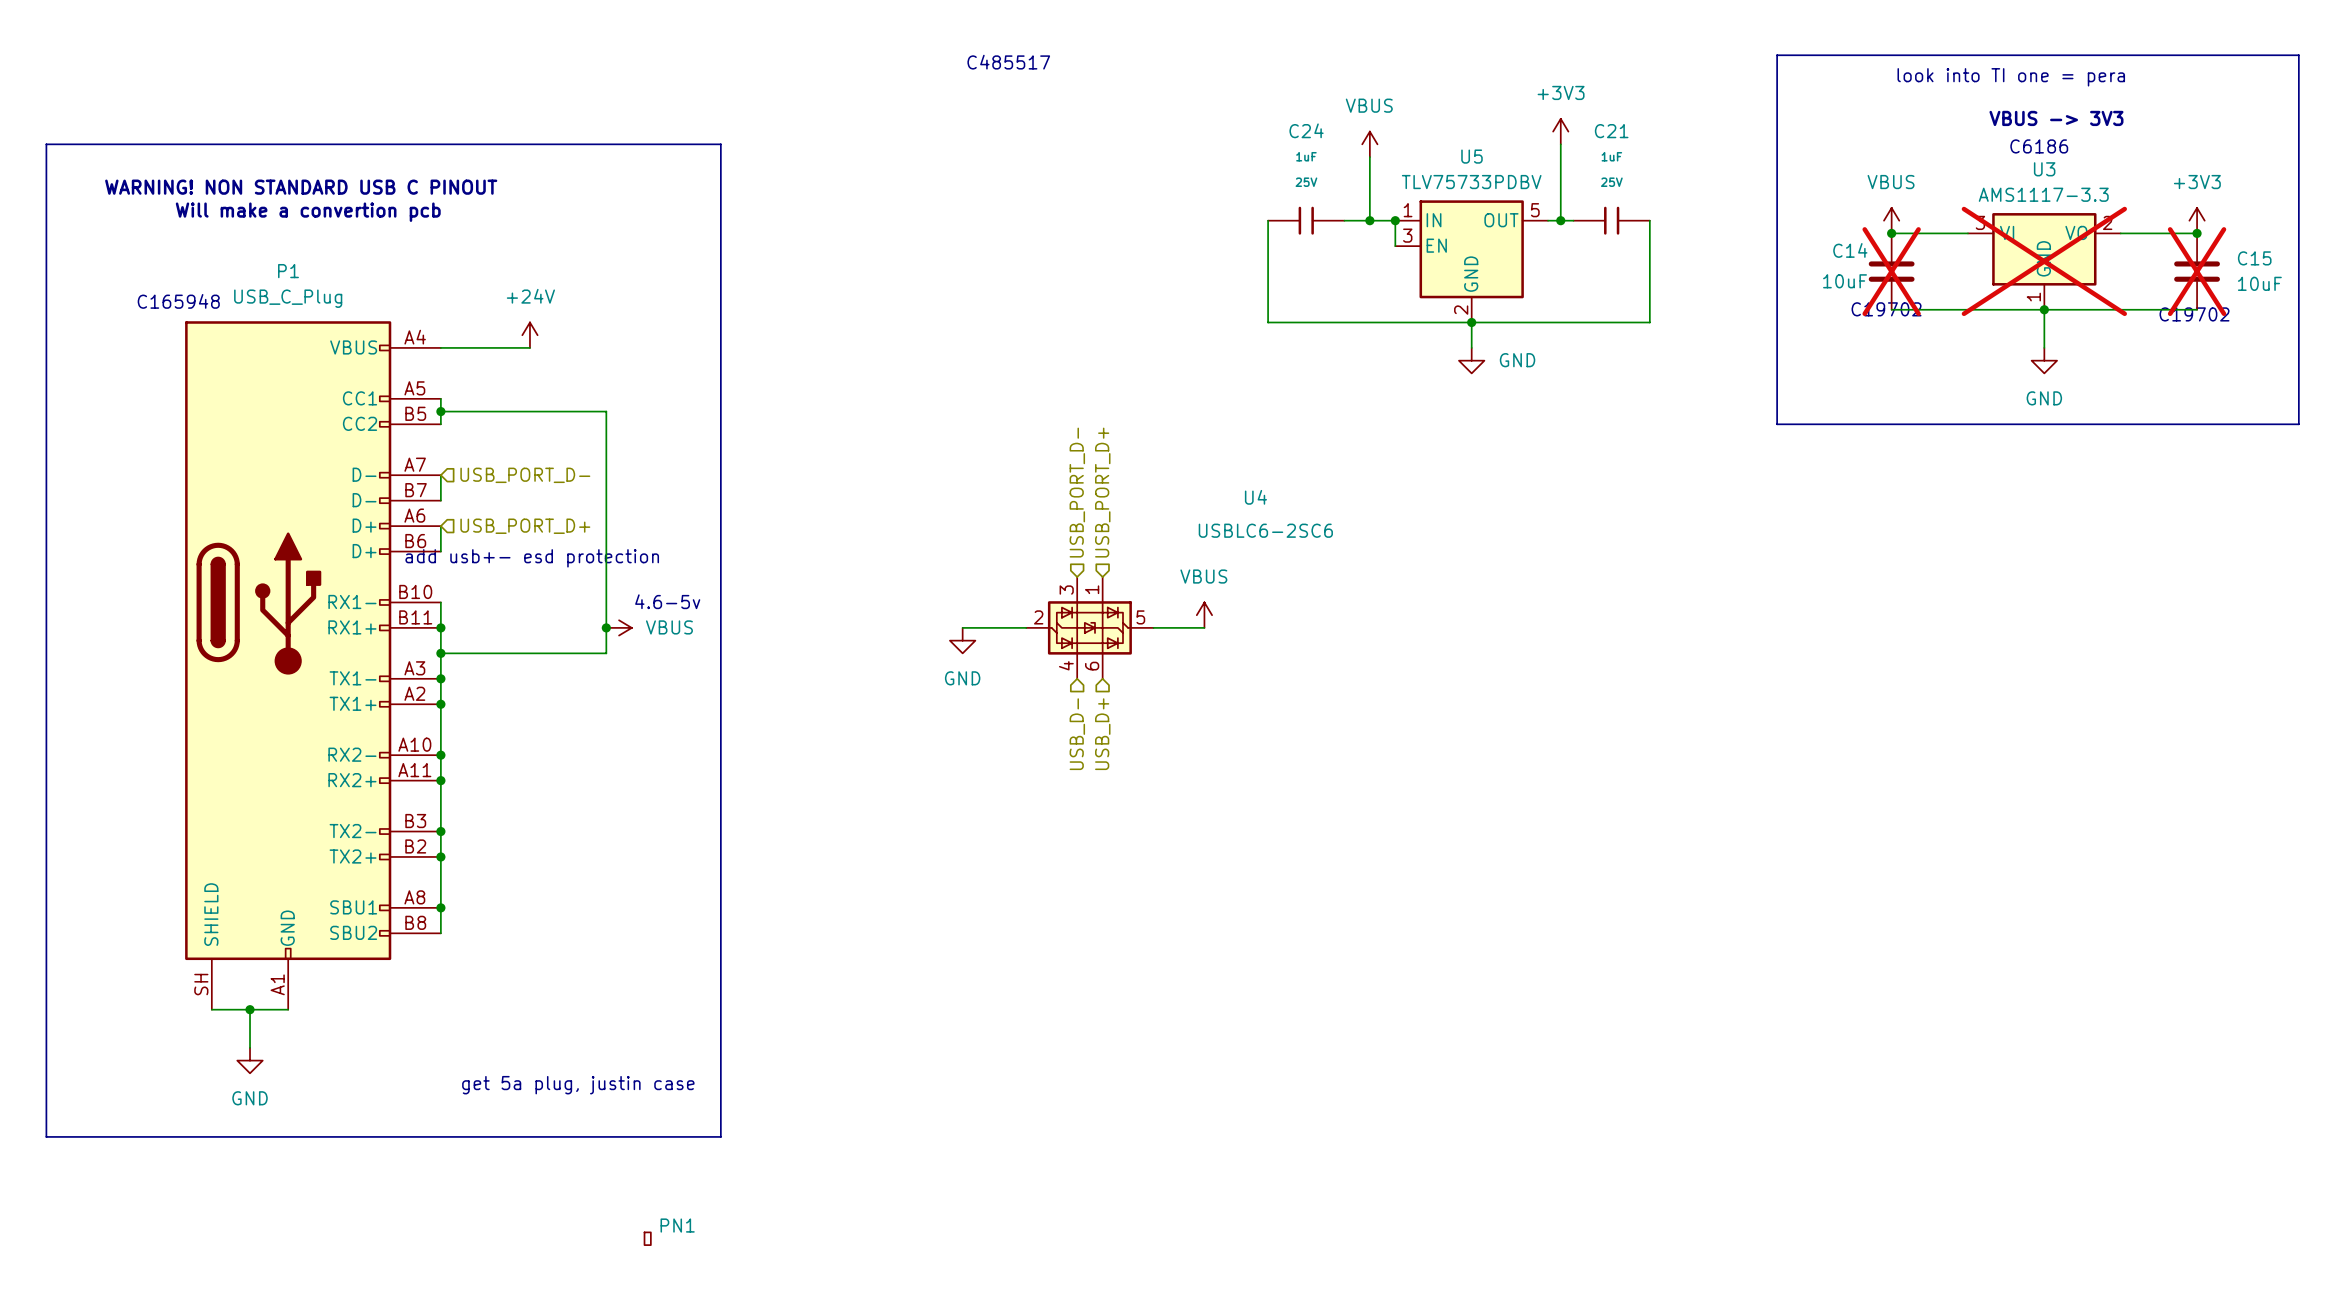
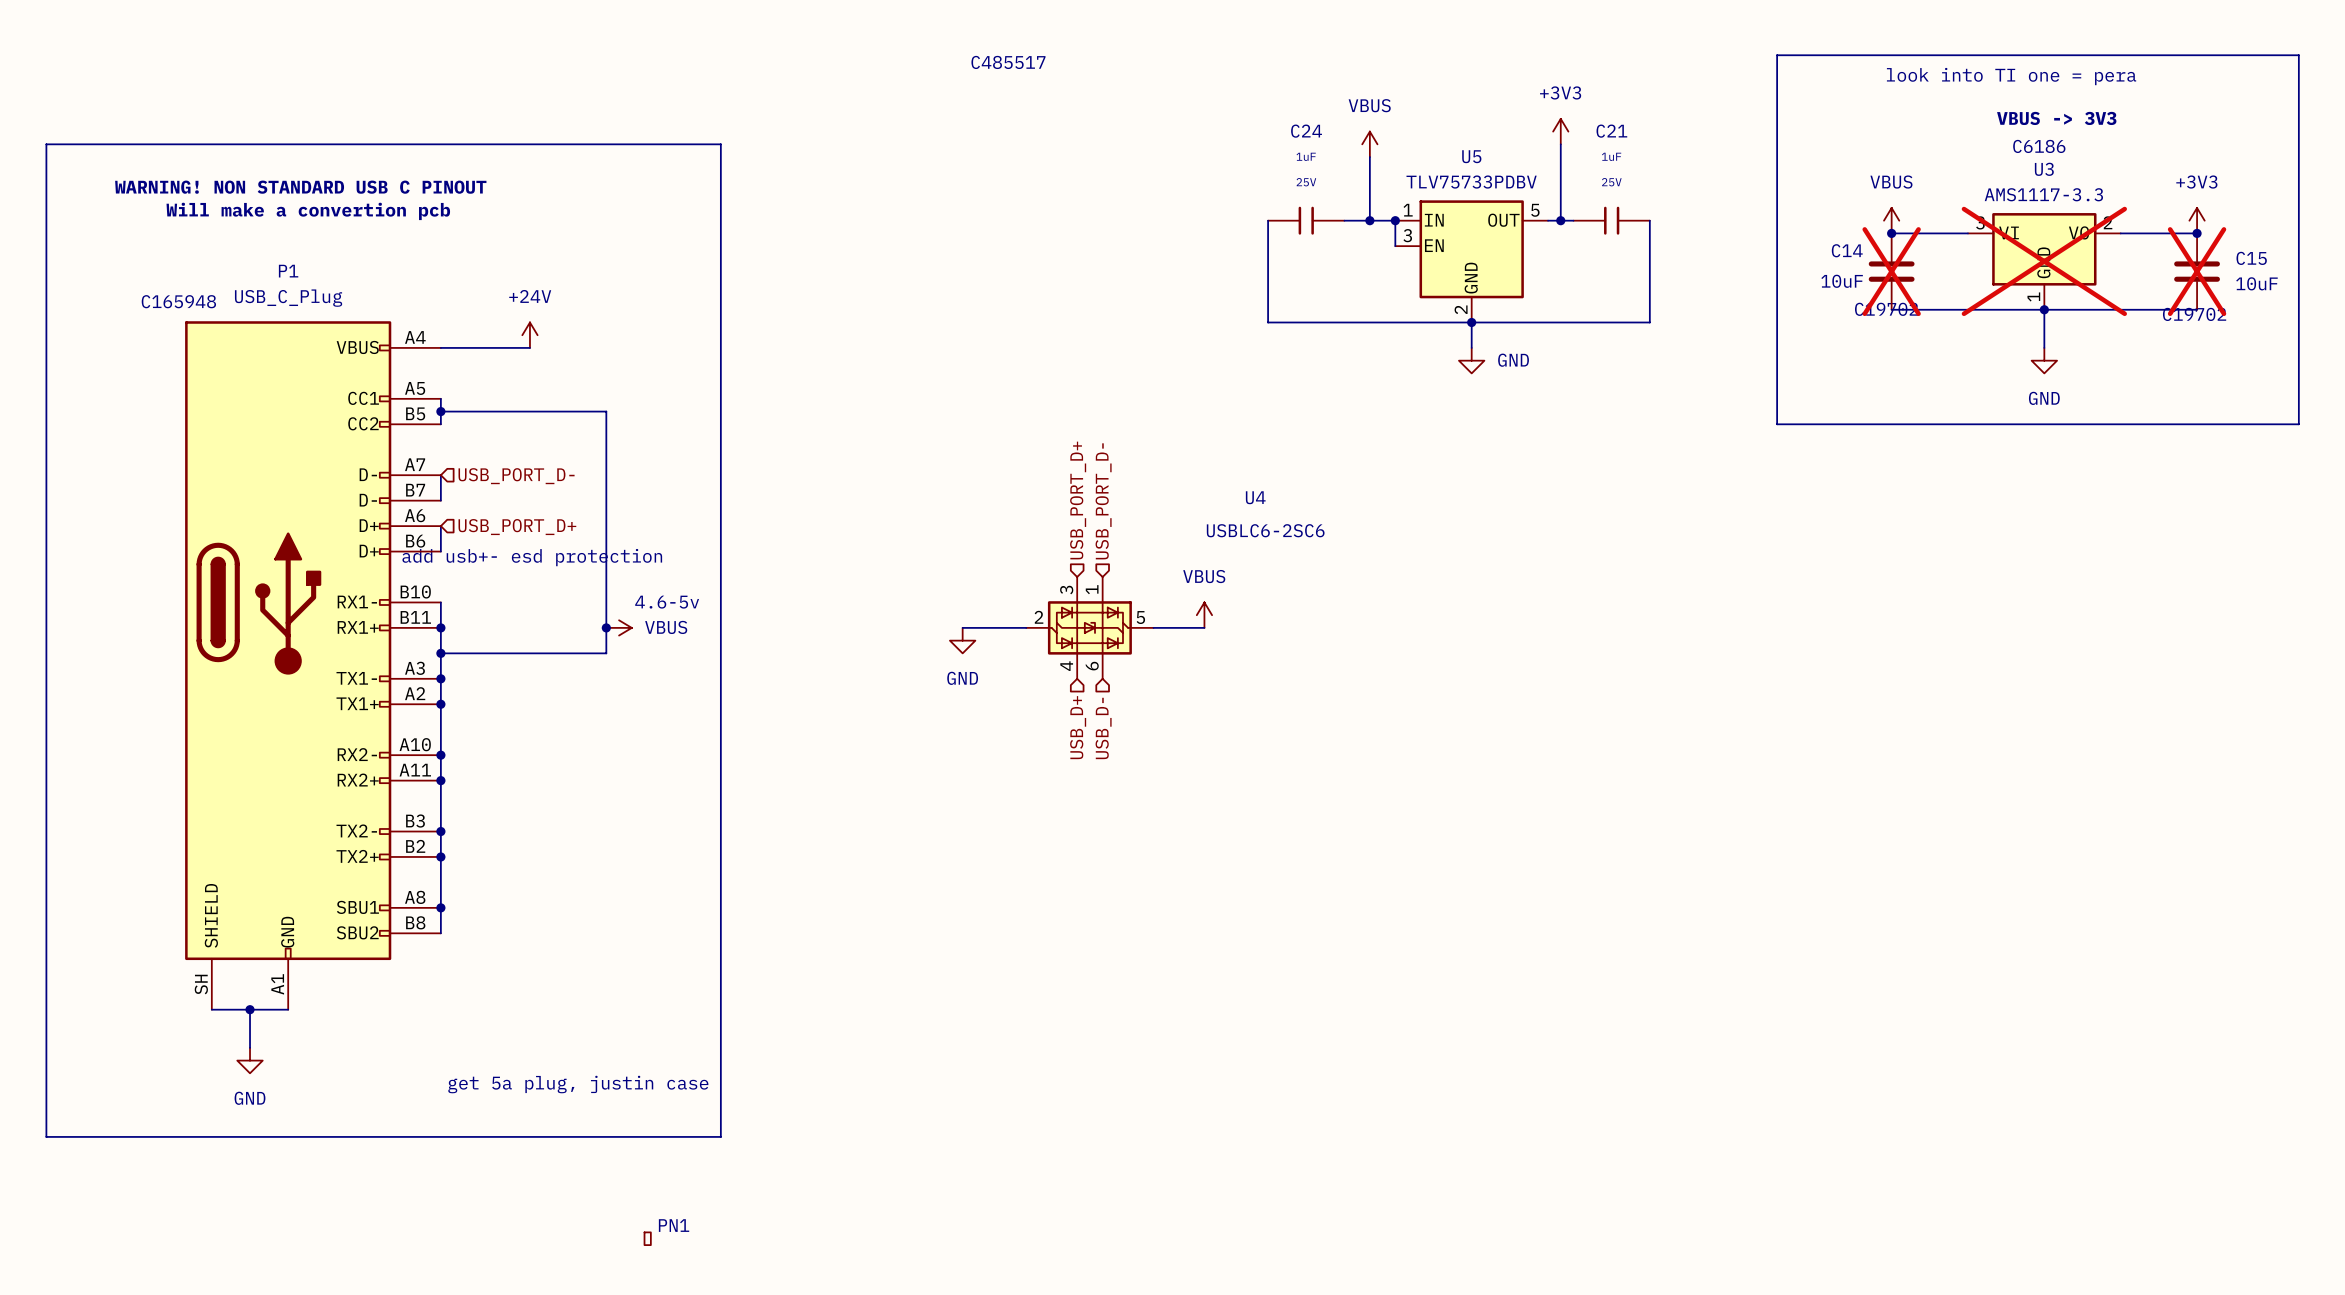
hierarchical label: USB_PORT_D- (1077, 492) -> USB_PORT_D+ (1078, 500)
hierarchical label: USB_PORT_D+ (1102, 492) -> USB_PORT_D- (1103, 501)
hierarchical label: USB_D- (1077, 734) -> USB_D+ (1078, 727)
hierarchical label: USB_D+ (1102, 734) -> USB_D- (1103, 728)

